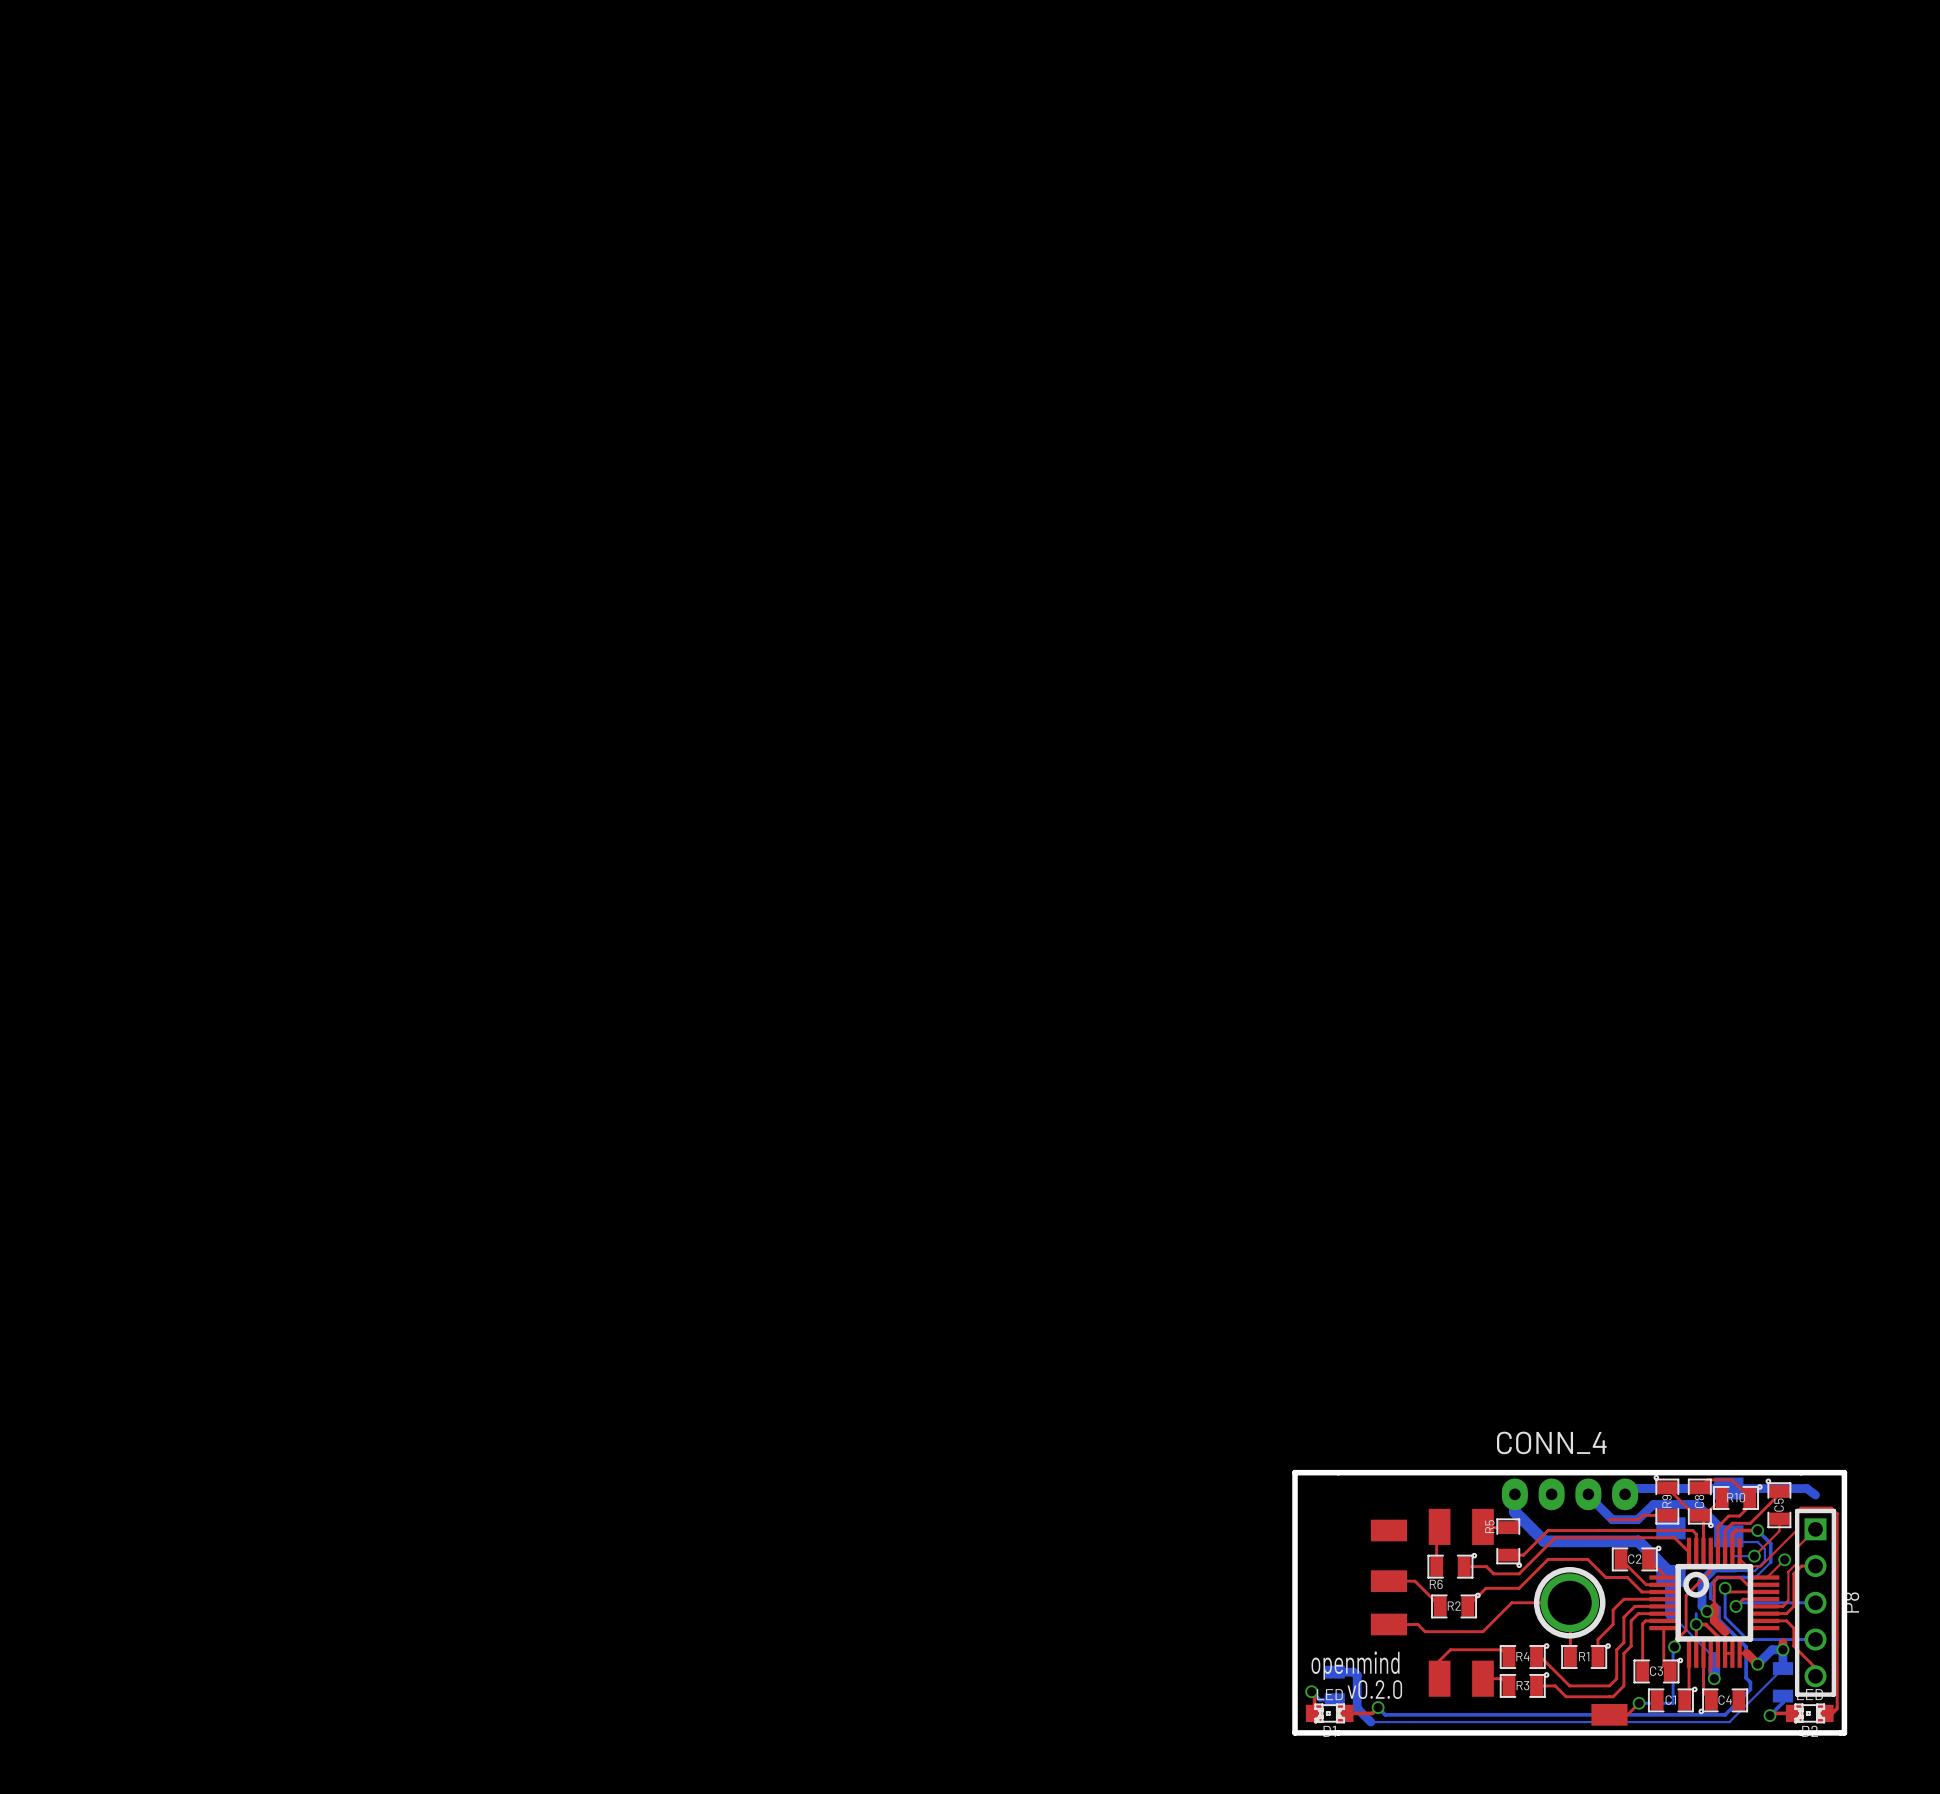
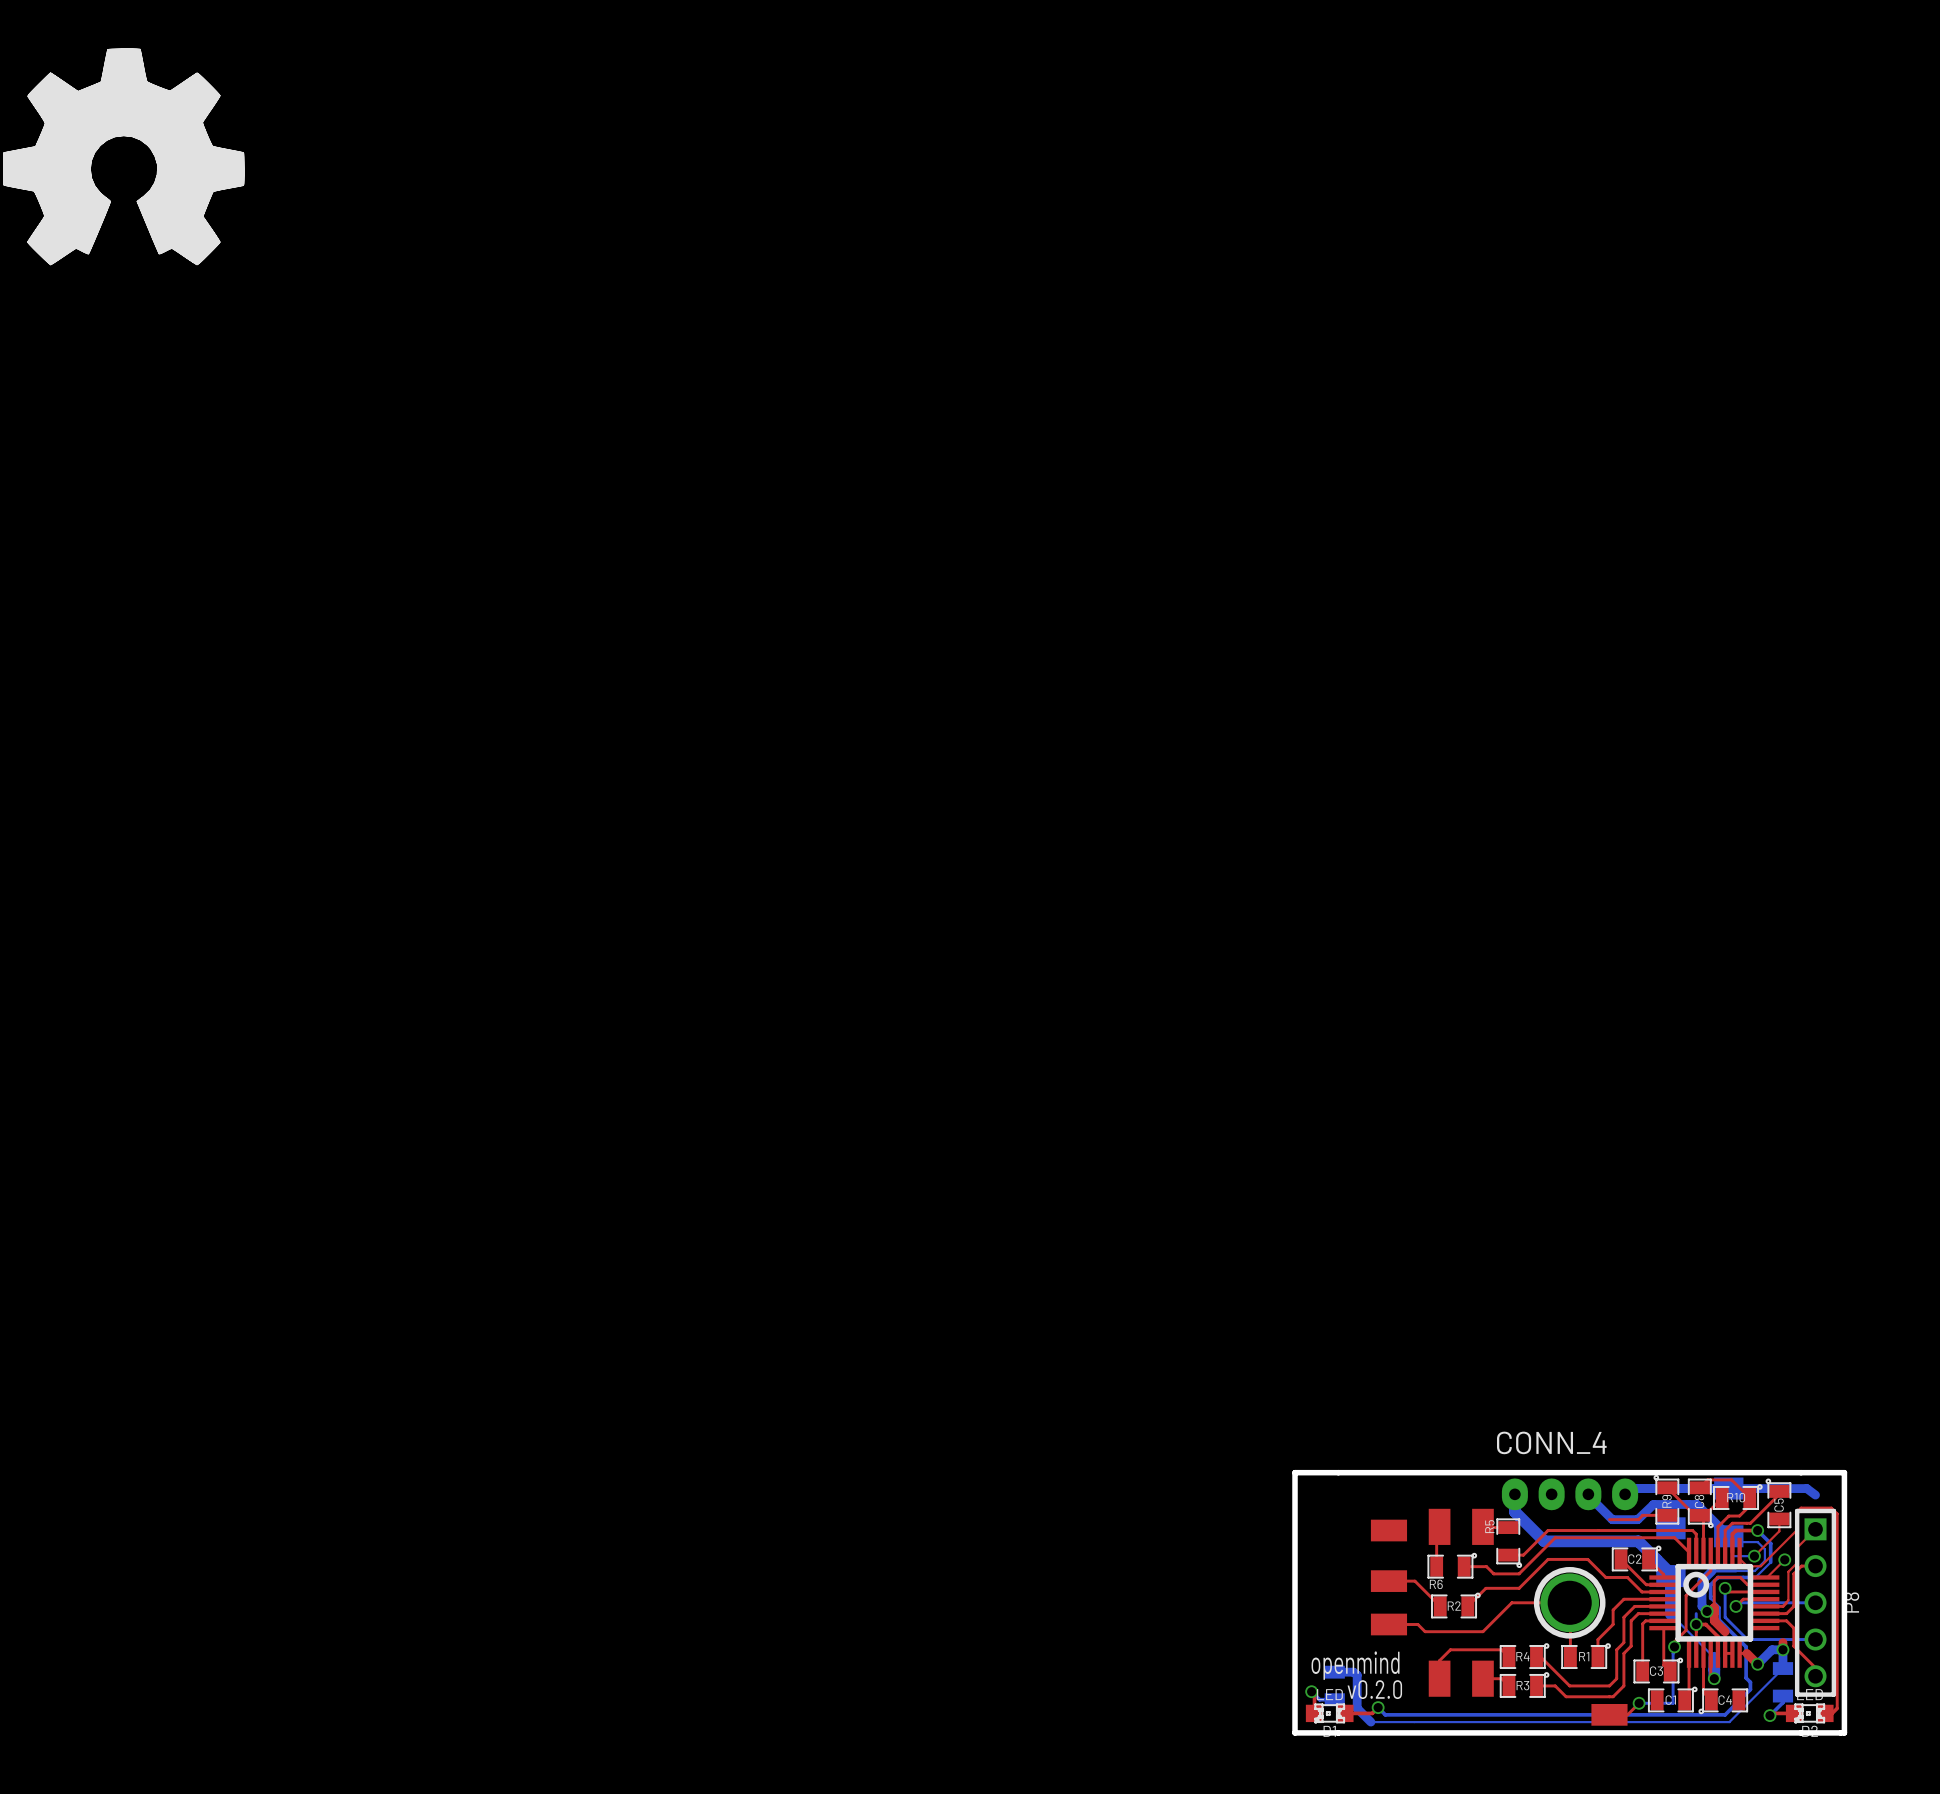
drawing: none -> [3, 48, 245, 266]

